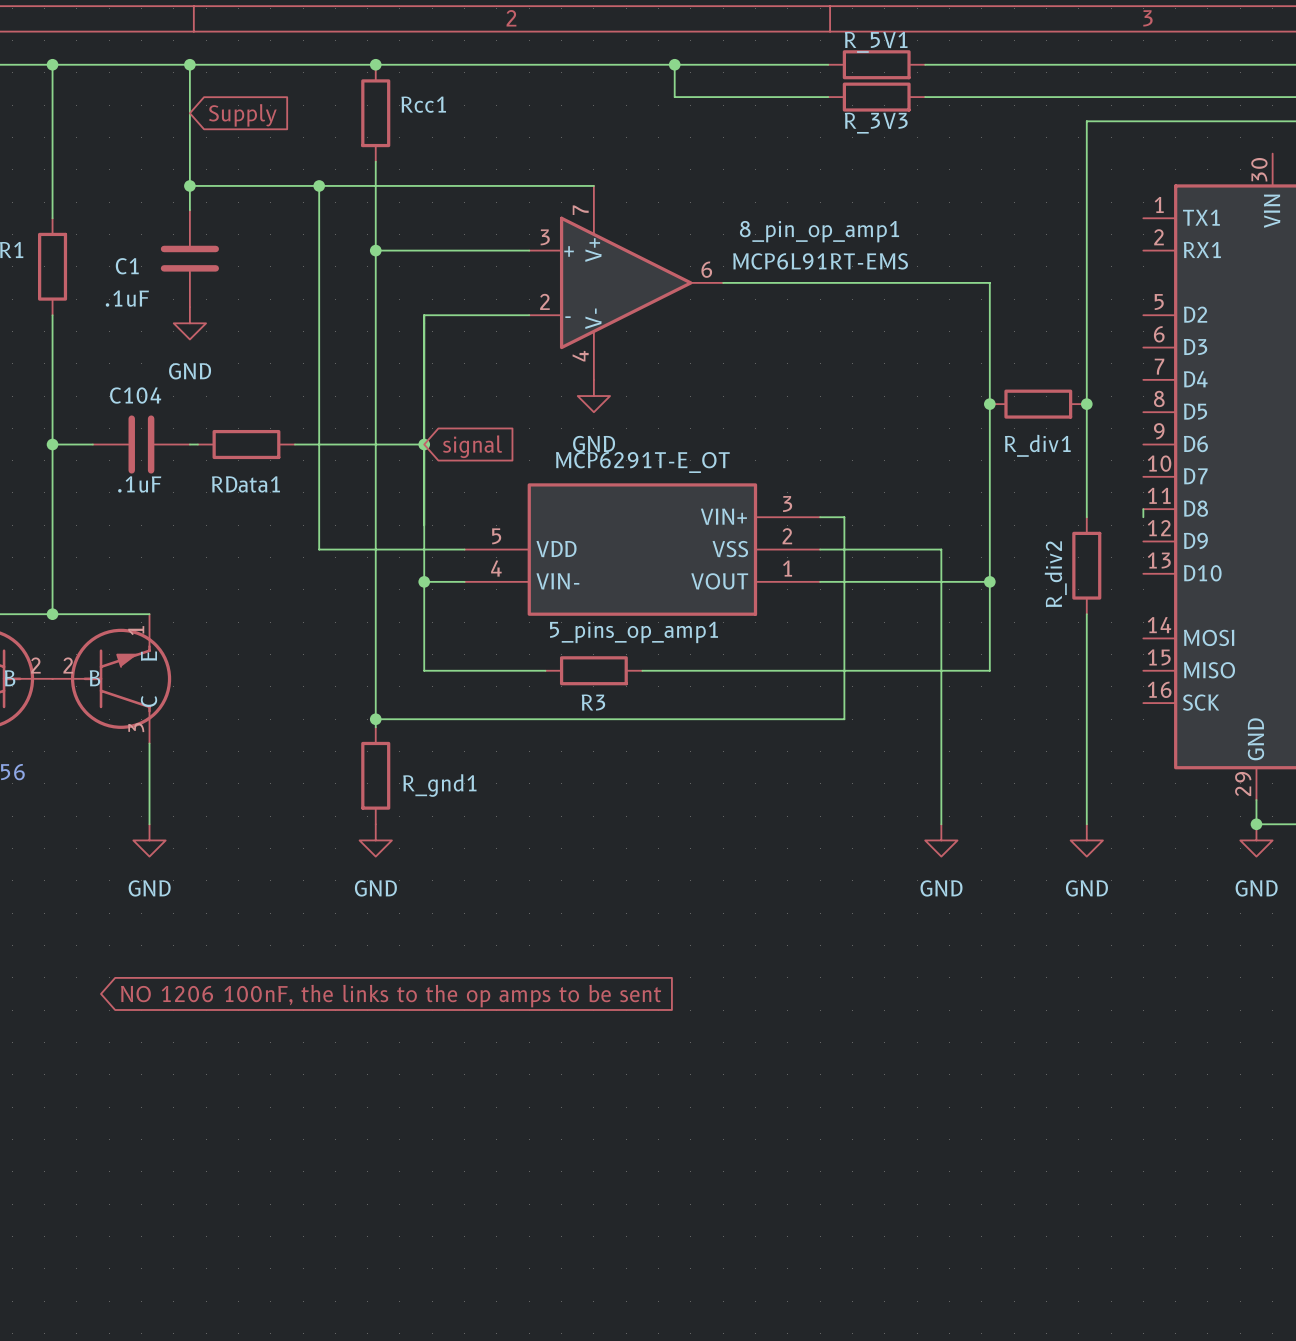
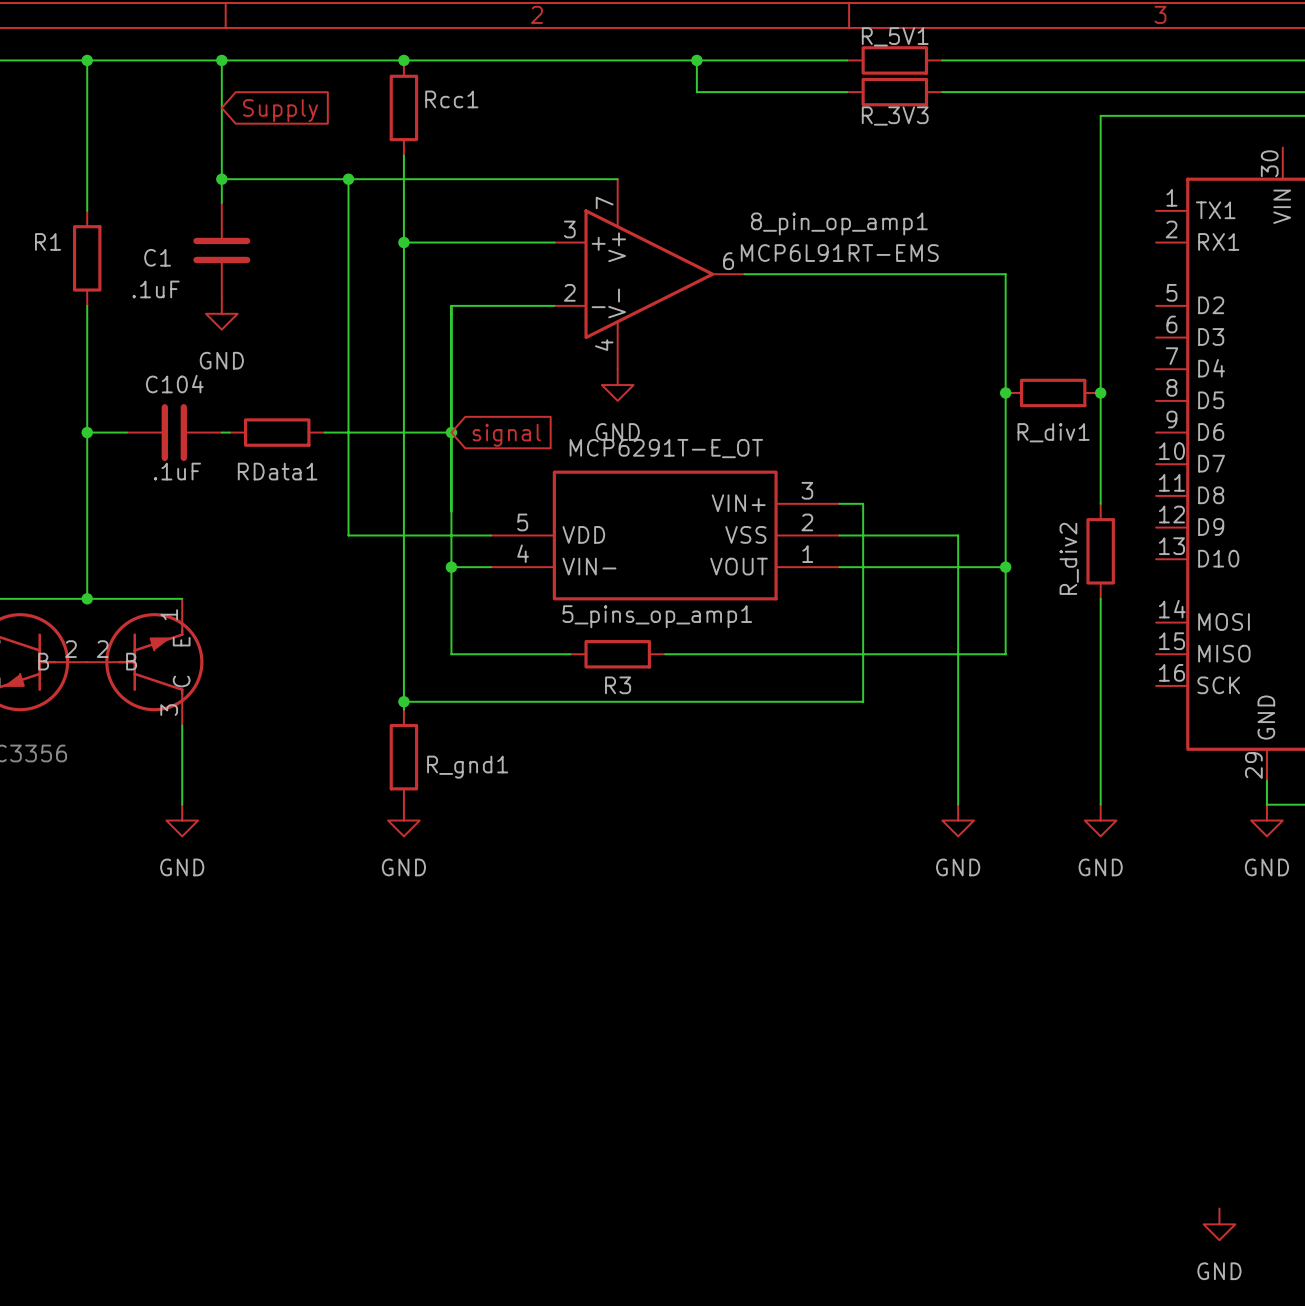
wire: (1143, 509) (1143, 517) -> none
junction: (1256, 824) -> none
global label: NO 1206 100nF, the links to the op amps to be sent (391, 996) -> none
power symbol: none -> GND (1219, 1224)

